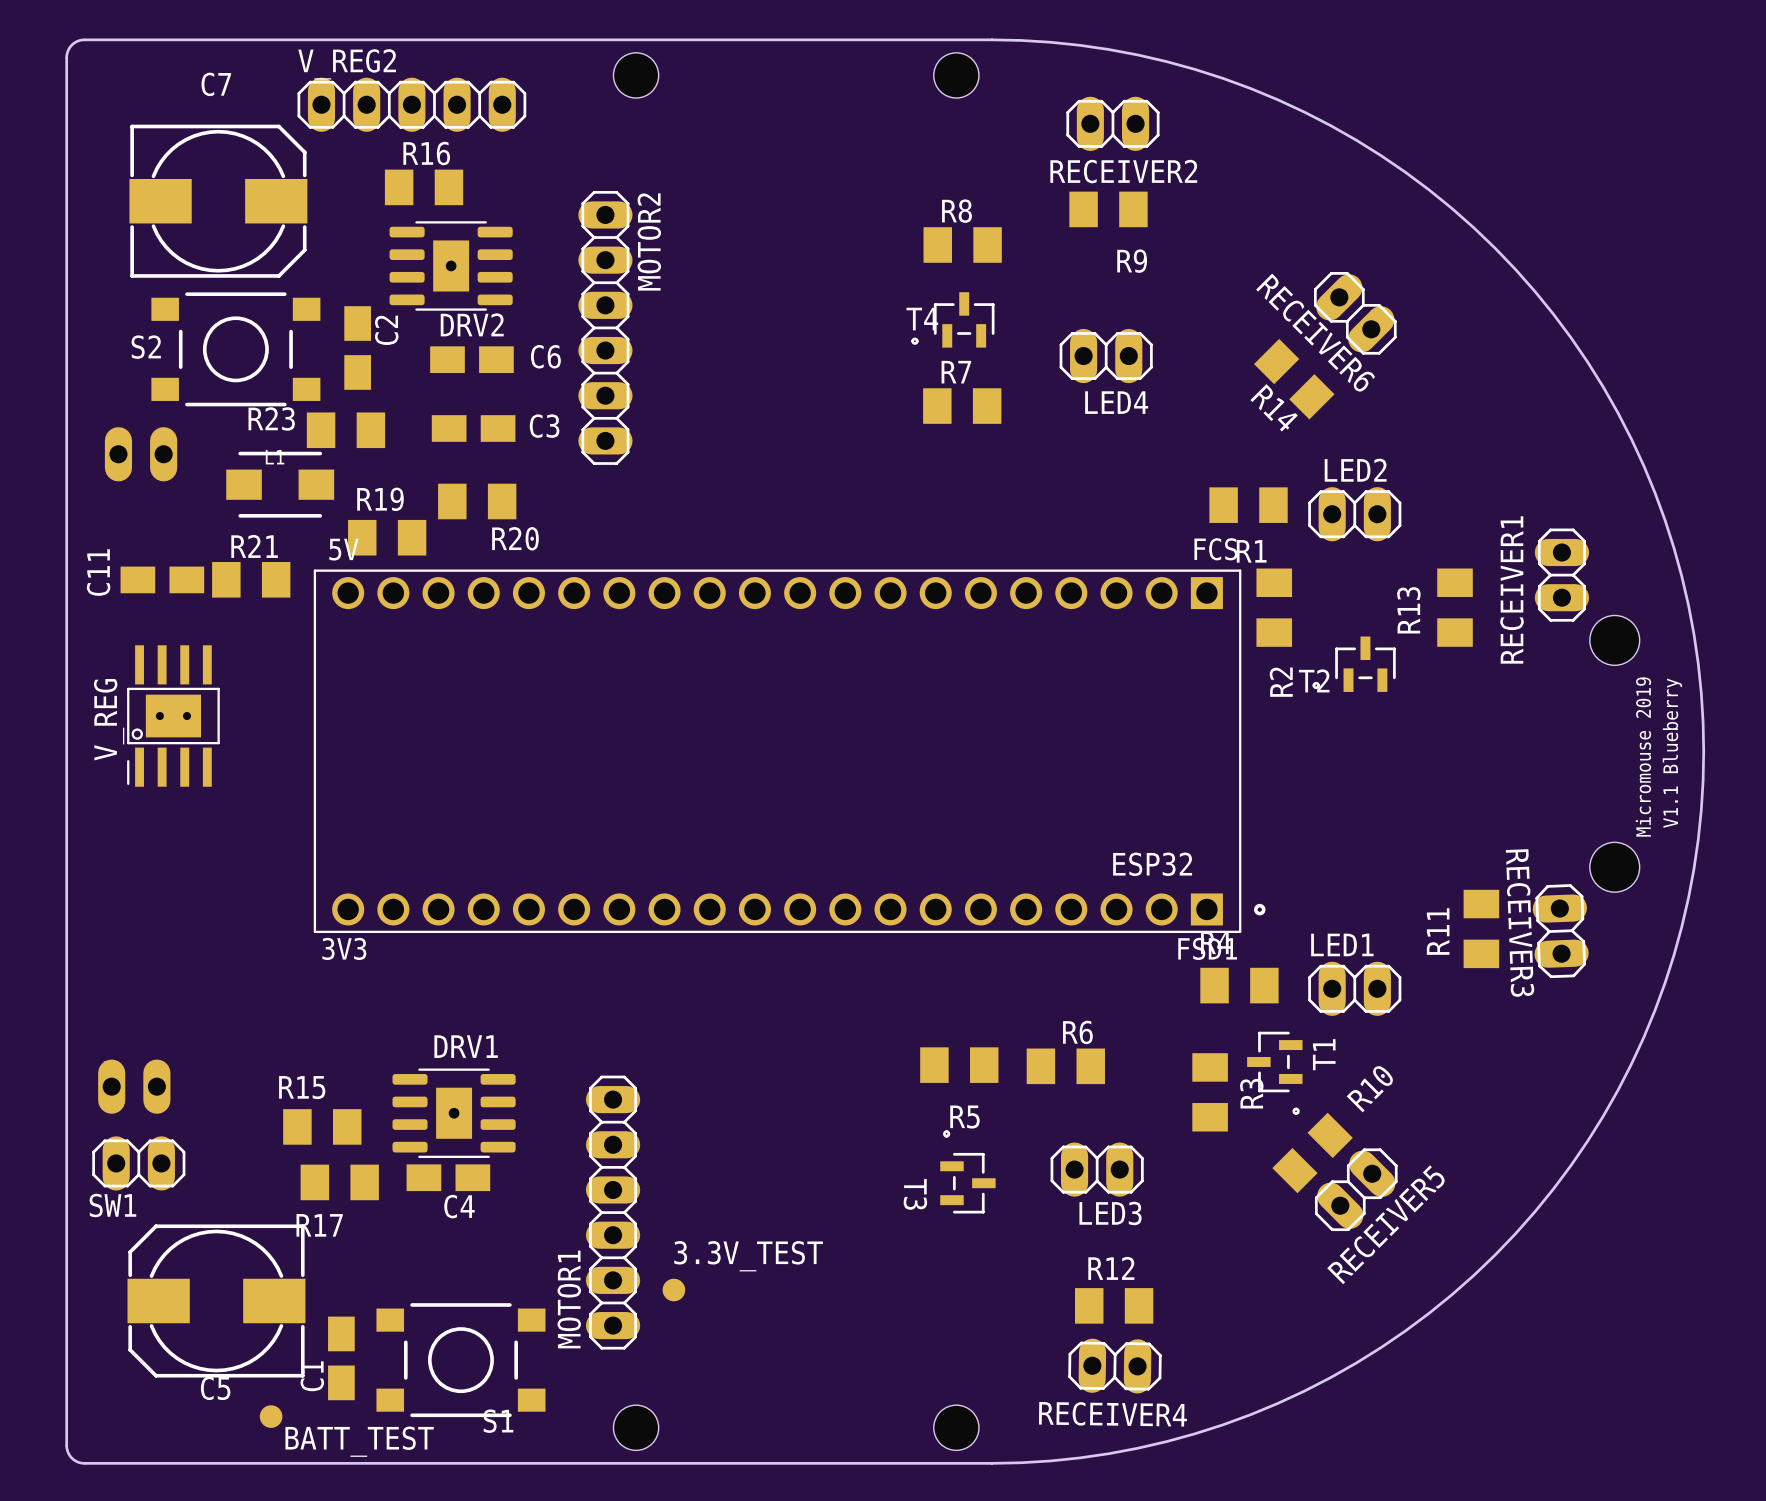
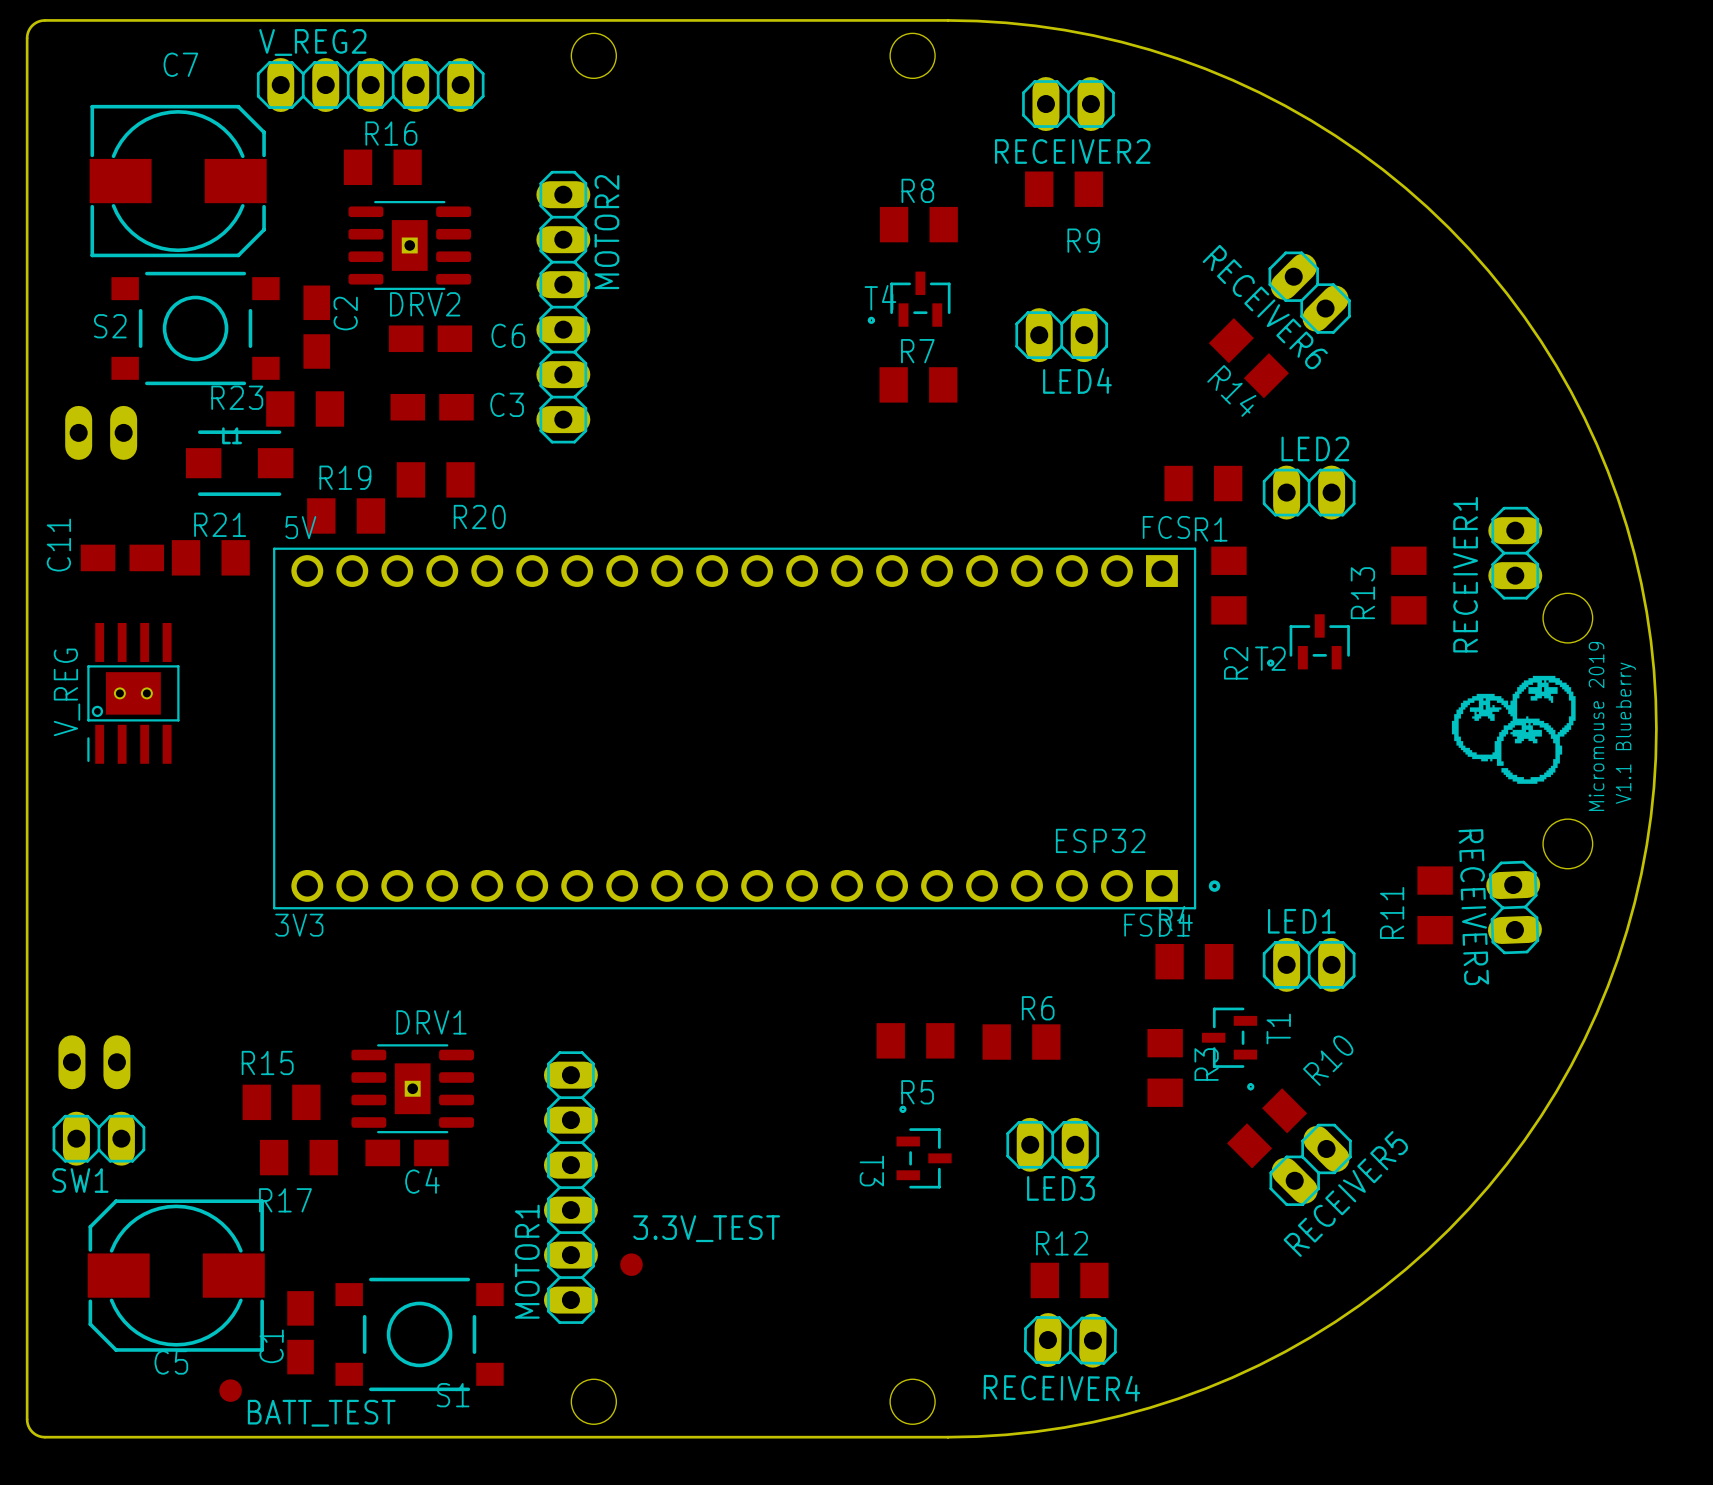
drawing: none -> [1451, 675, 1576, 784]

